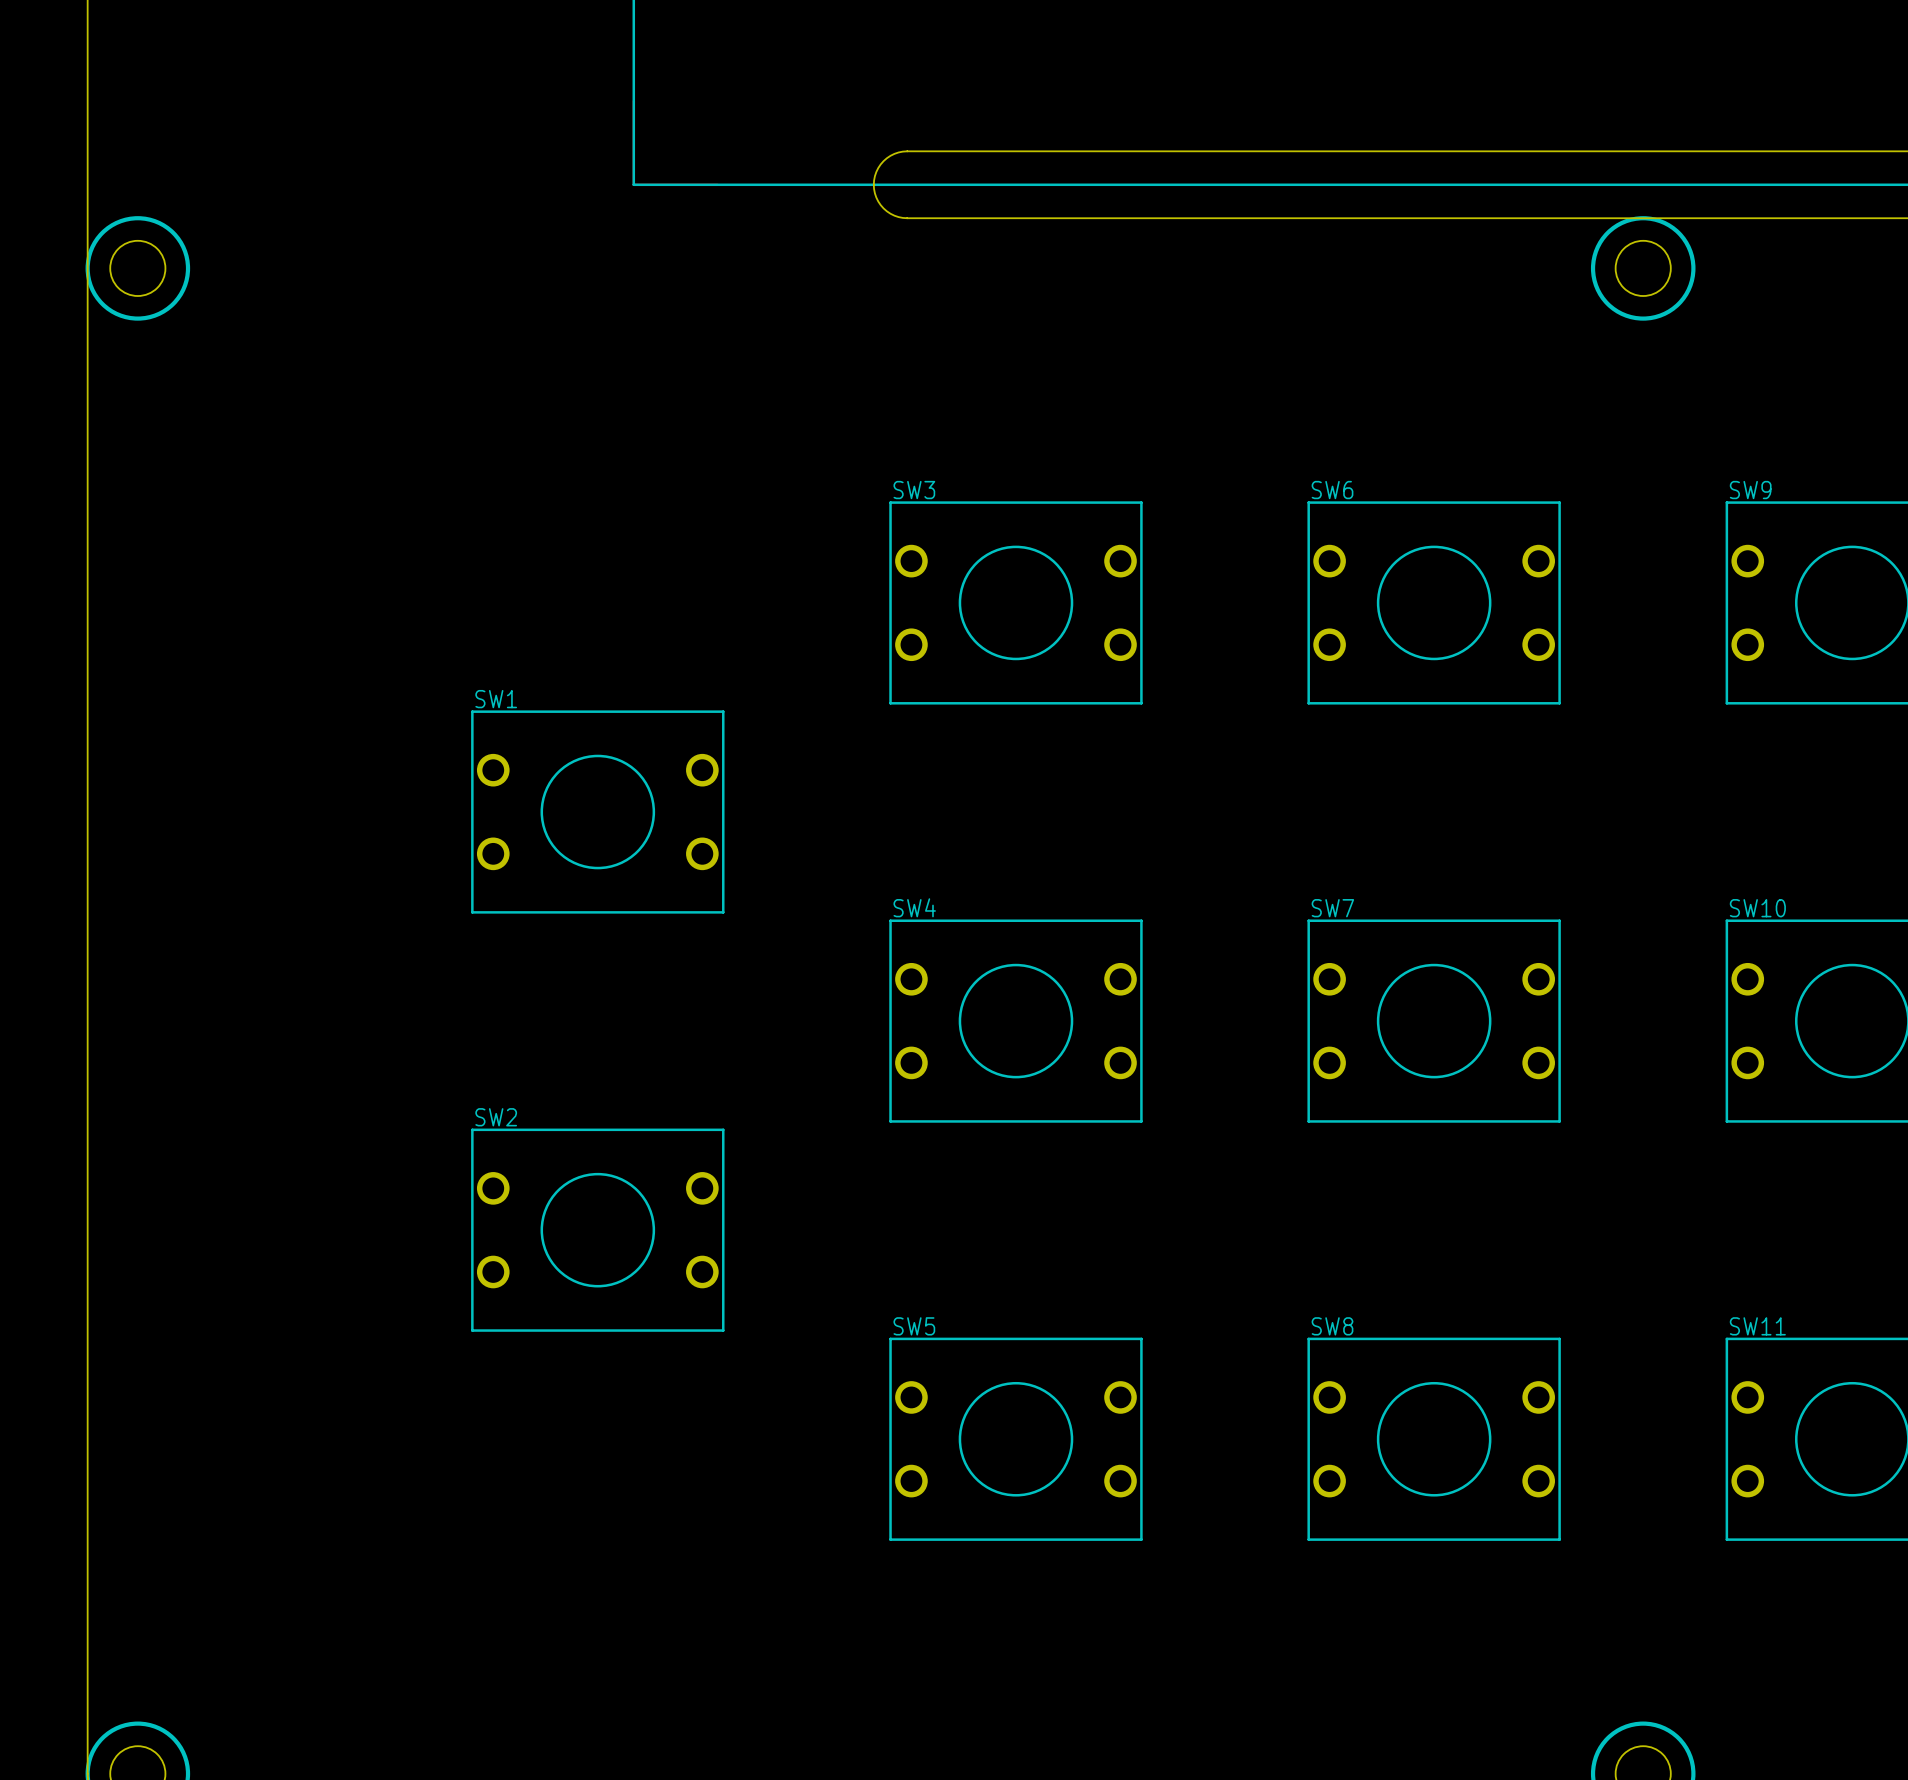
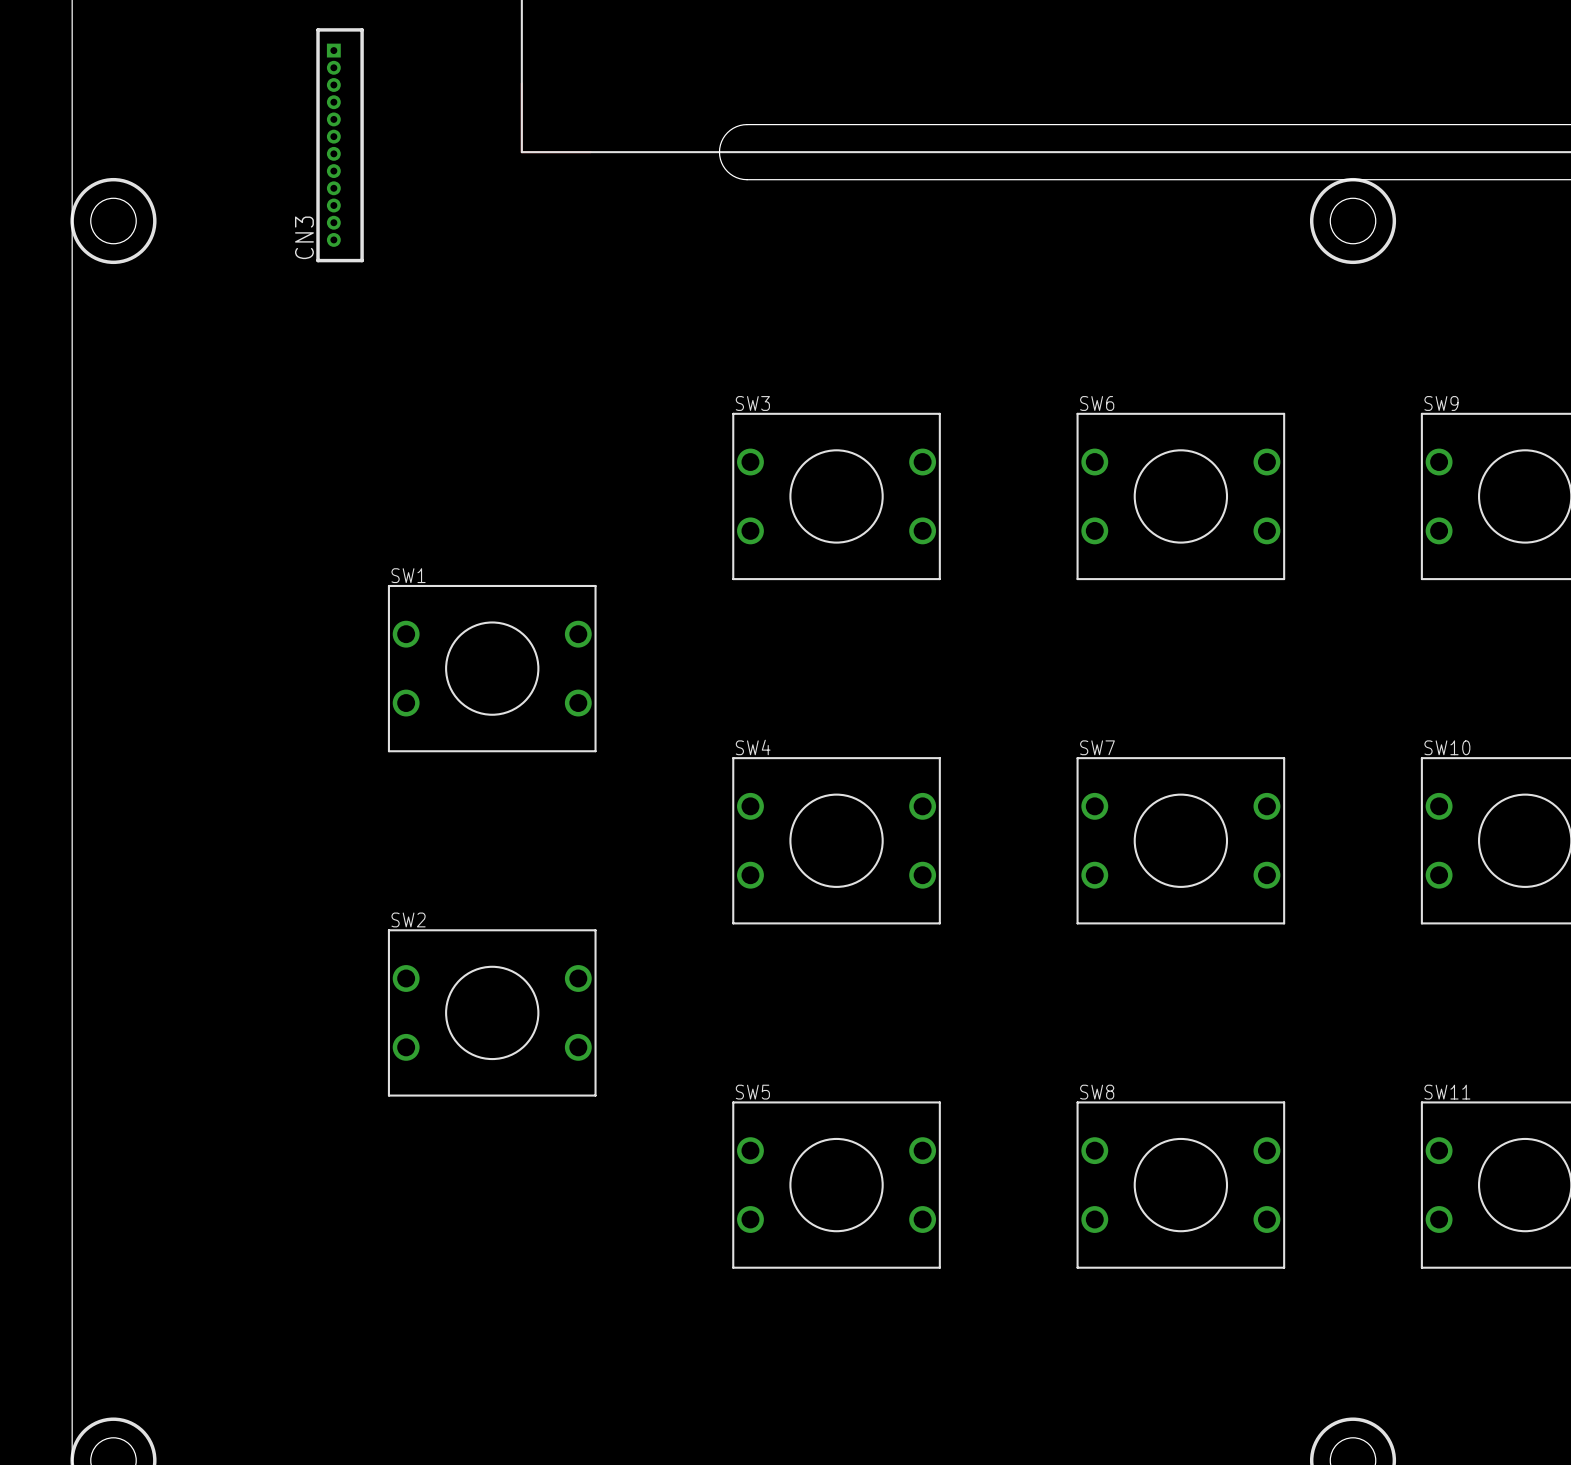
CN3: none -> (340, 145)

